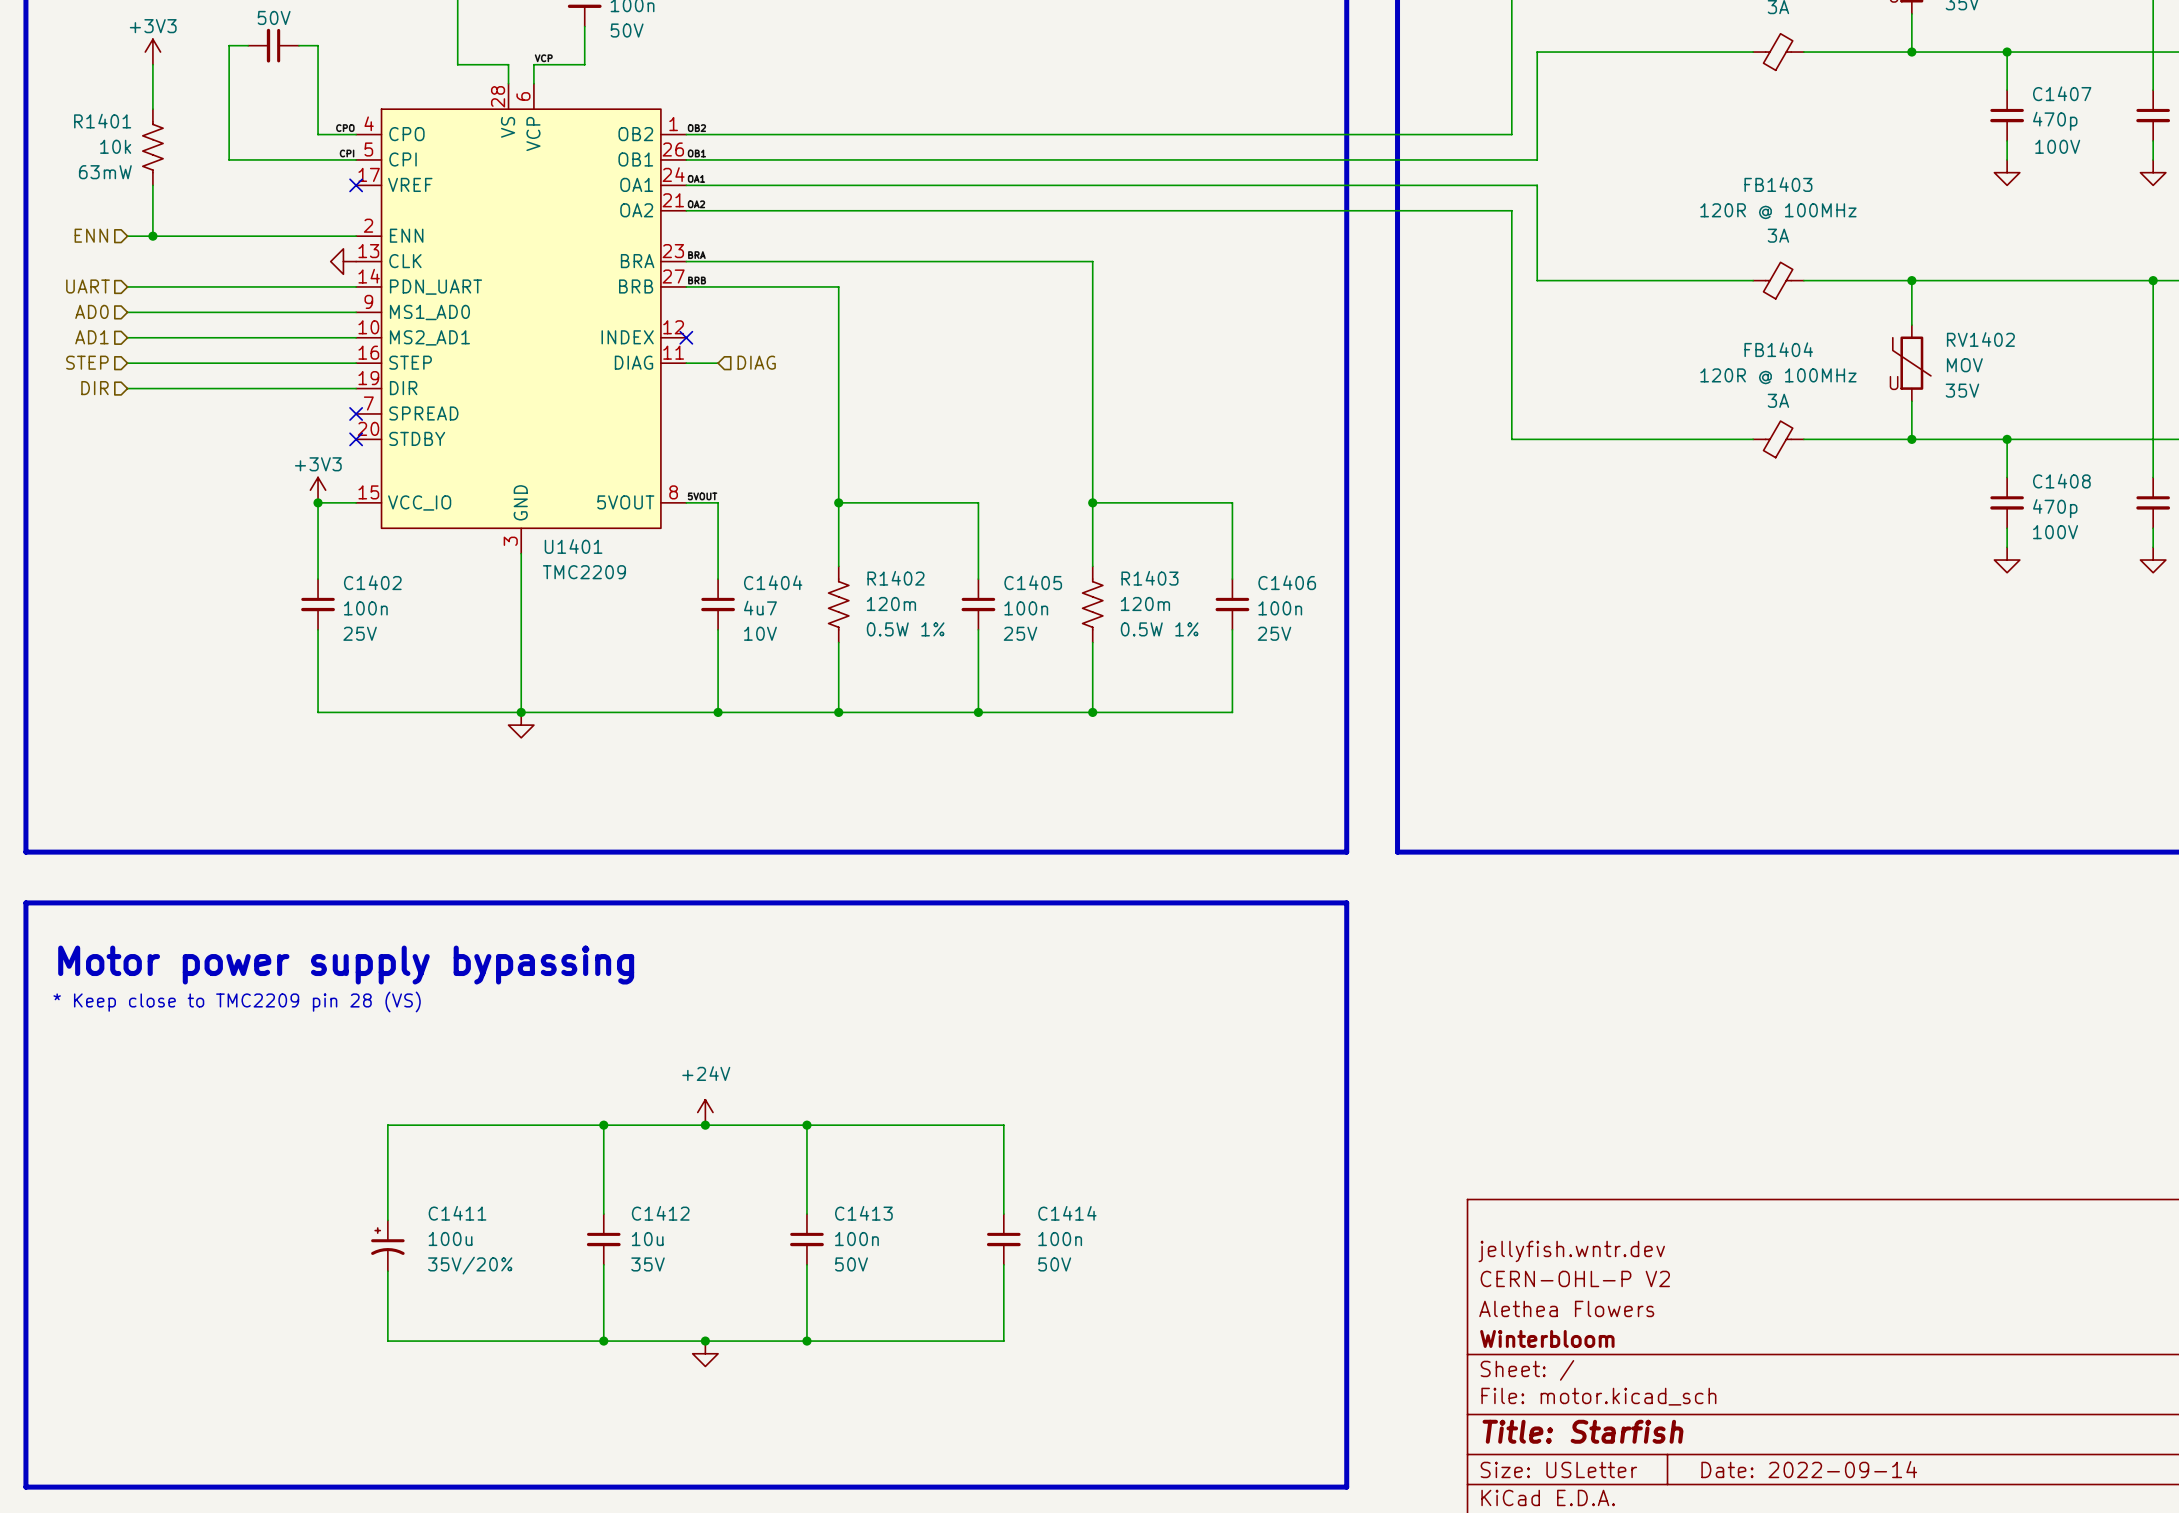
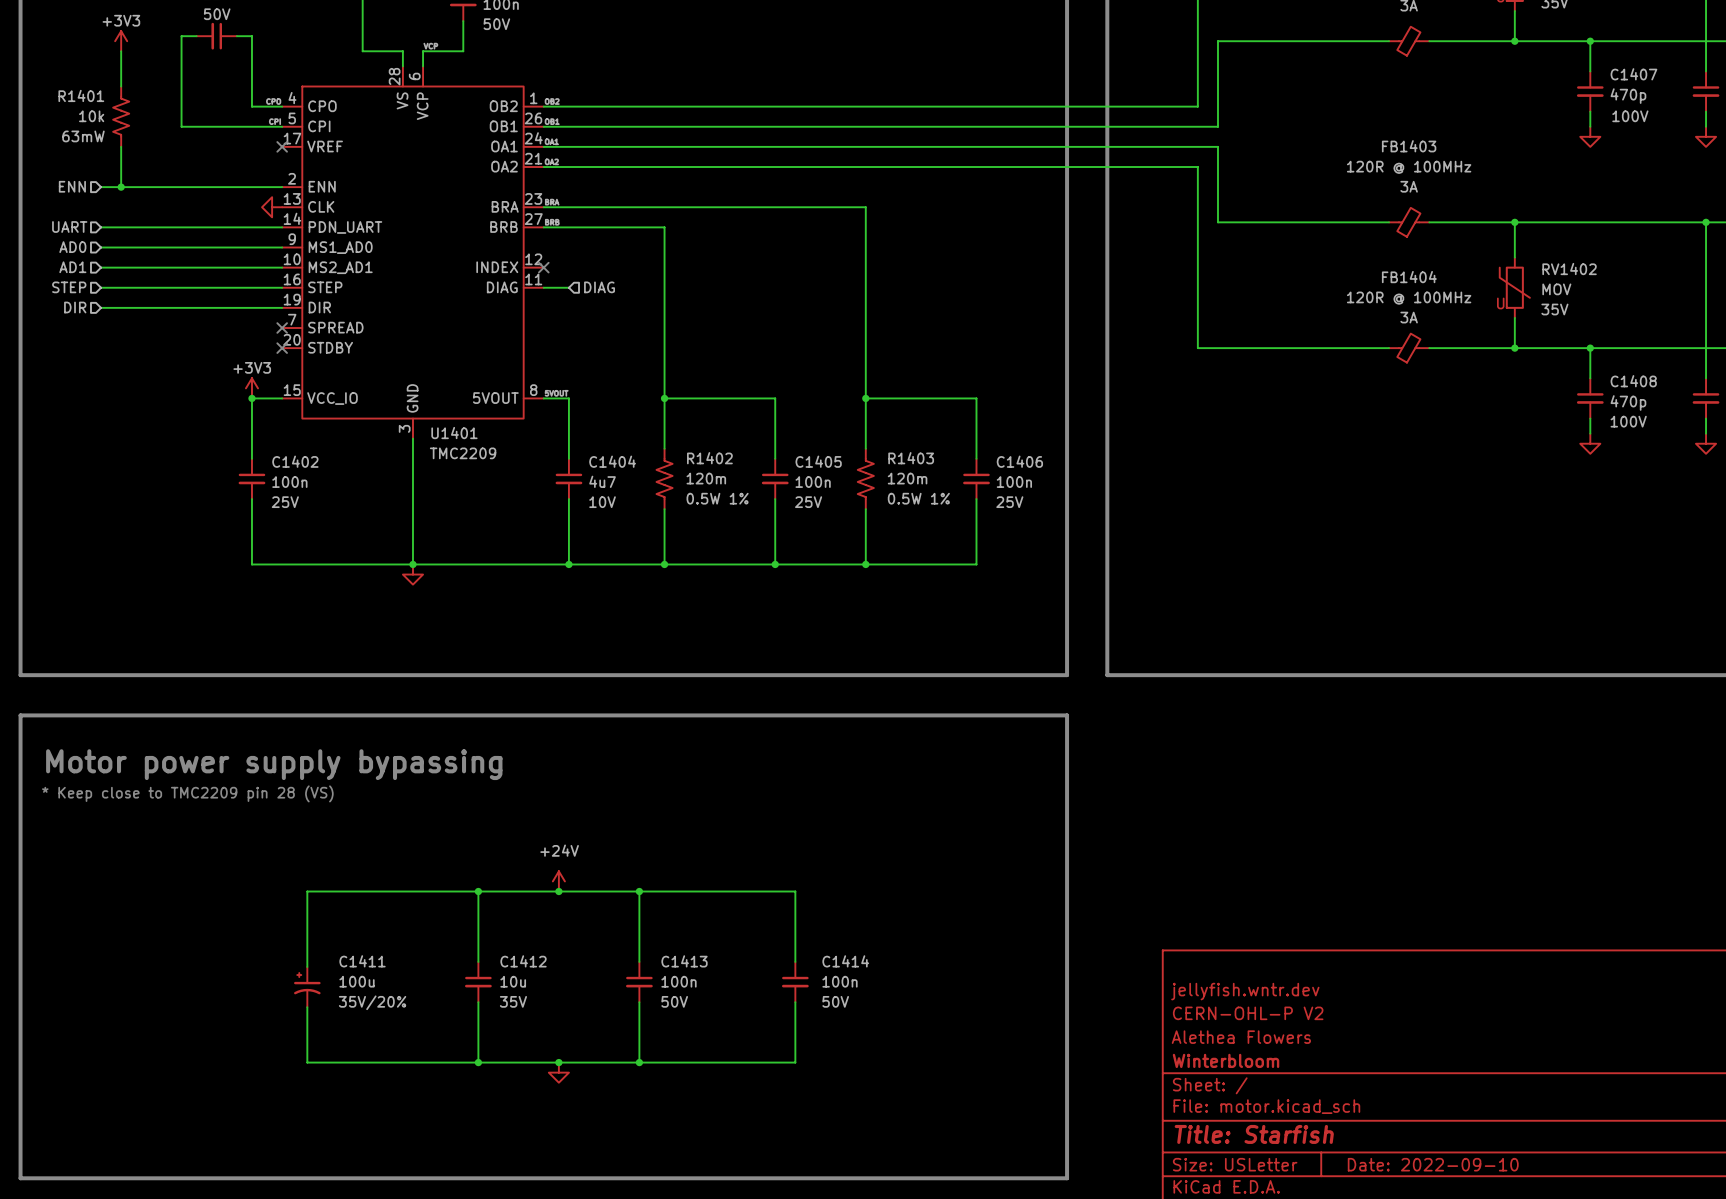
title block: Date: 2022-09-14 (1809, 1469) -> Date: 2022-09-10 (1433, 1164)

